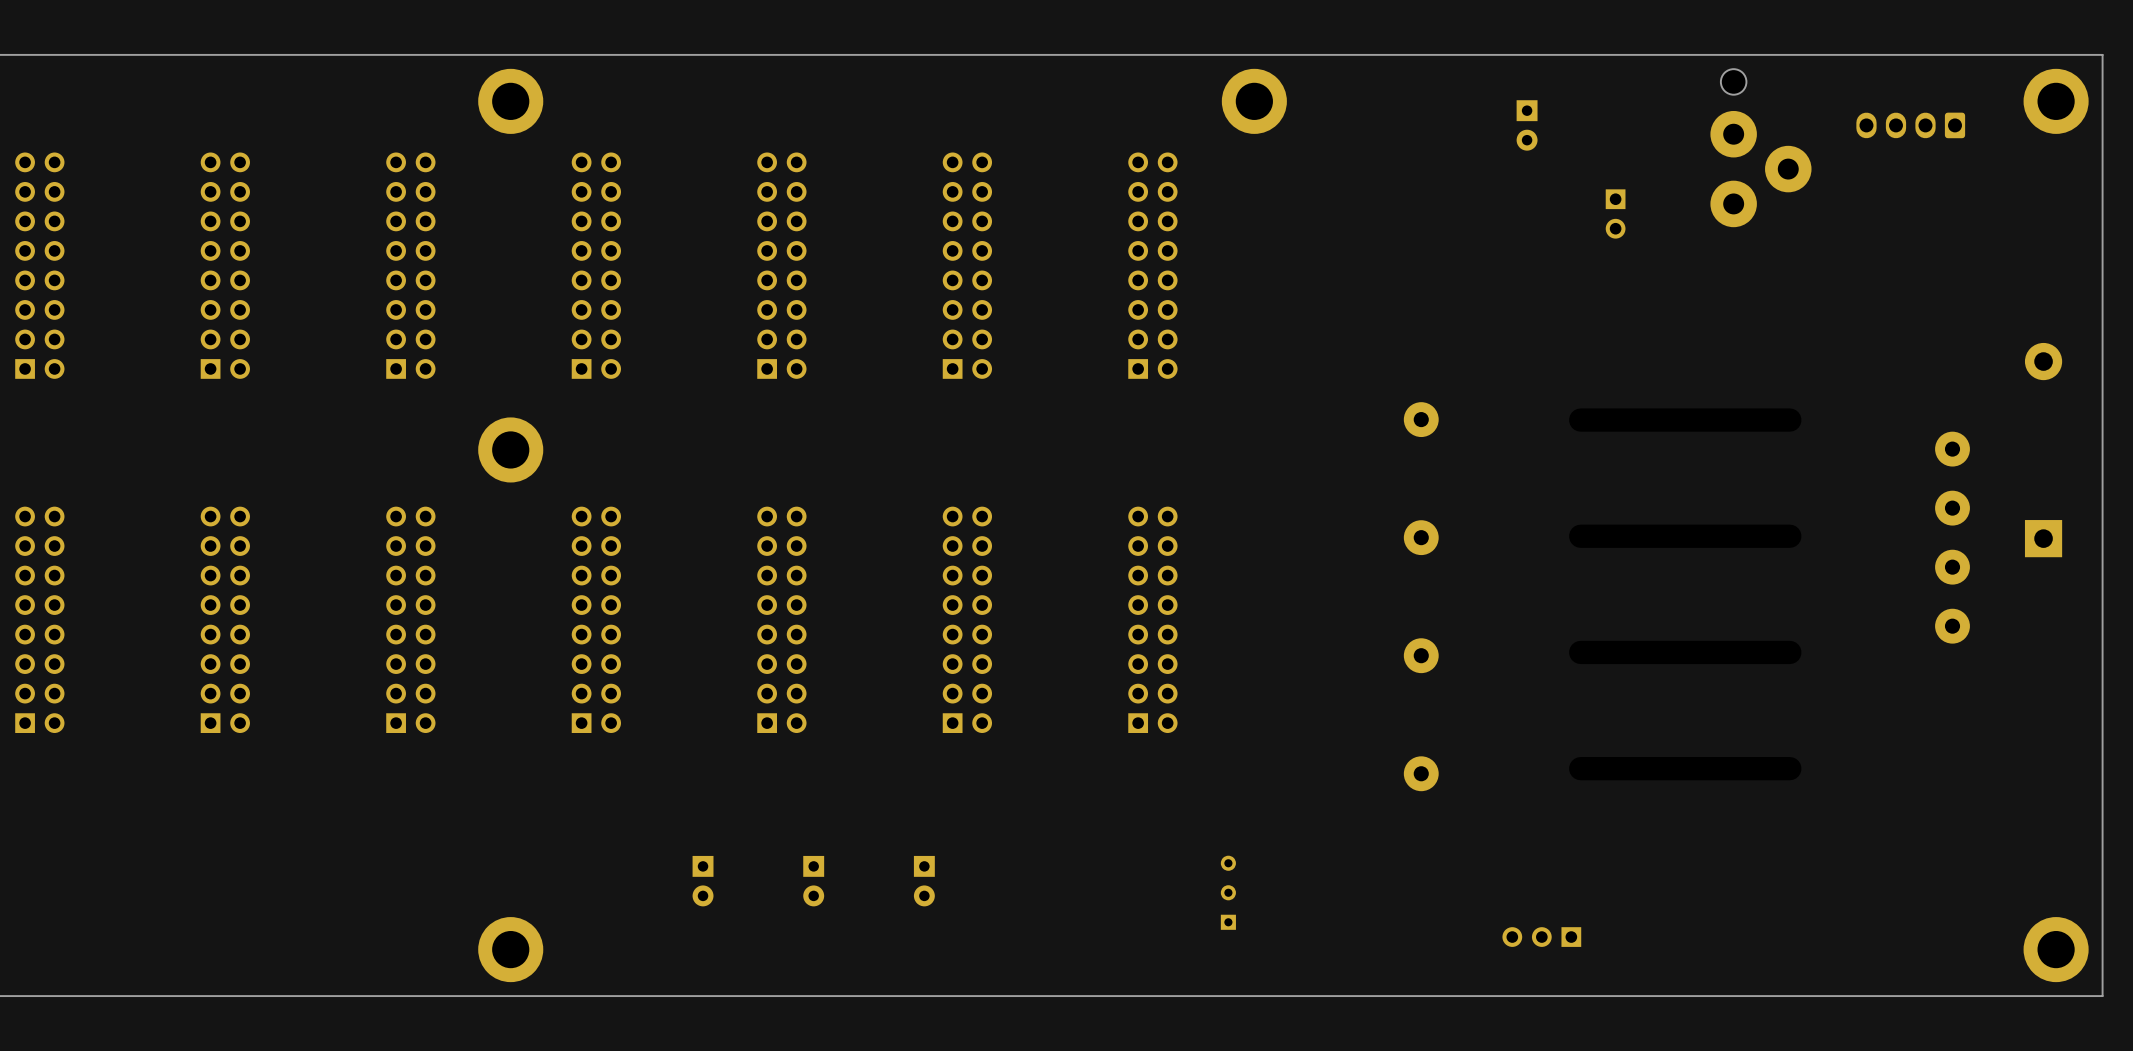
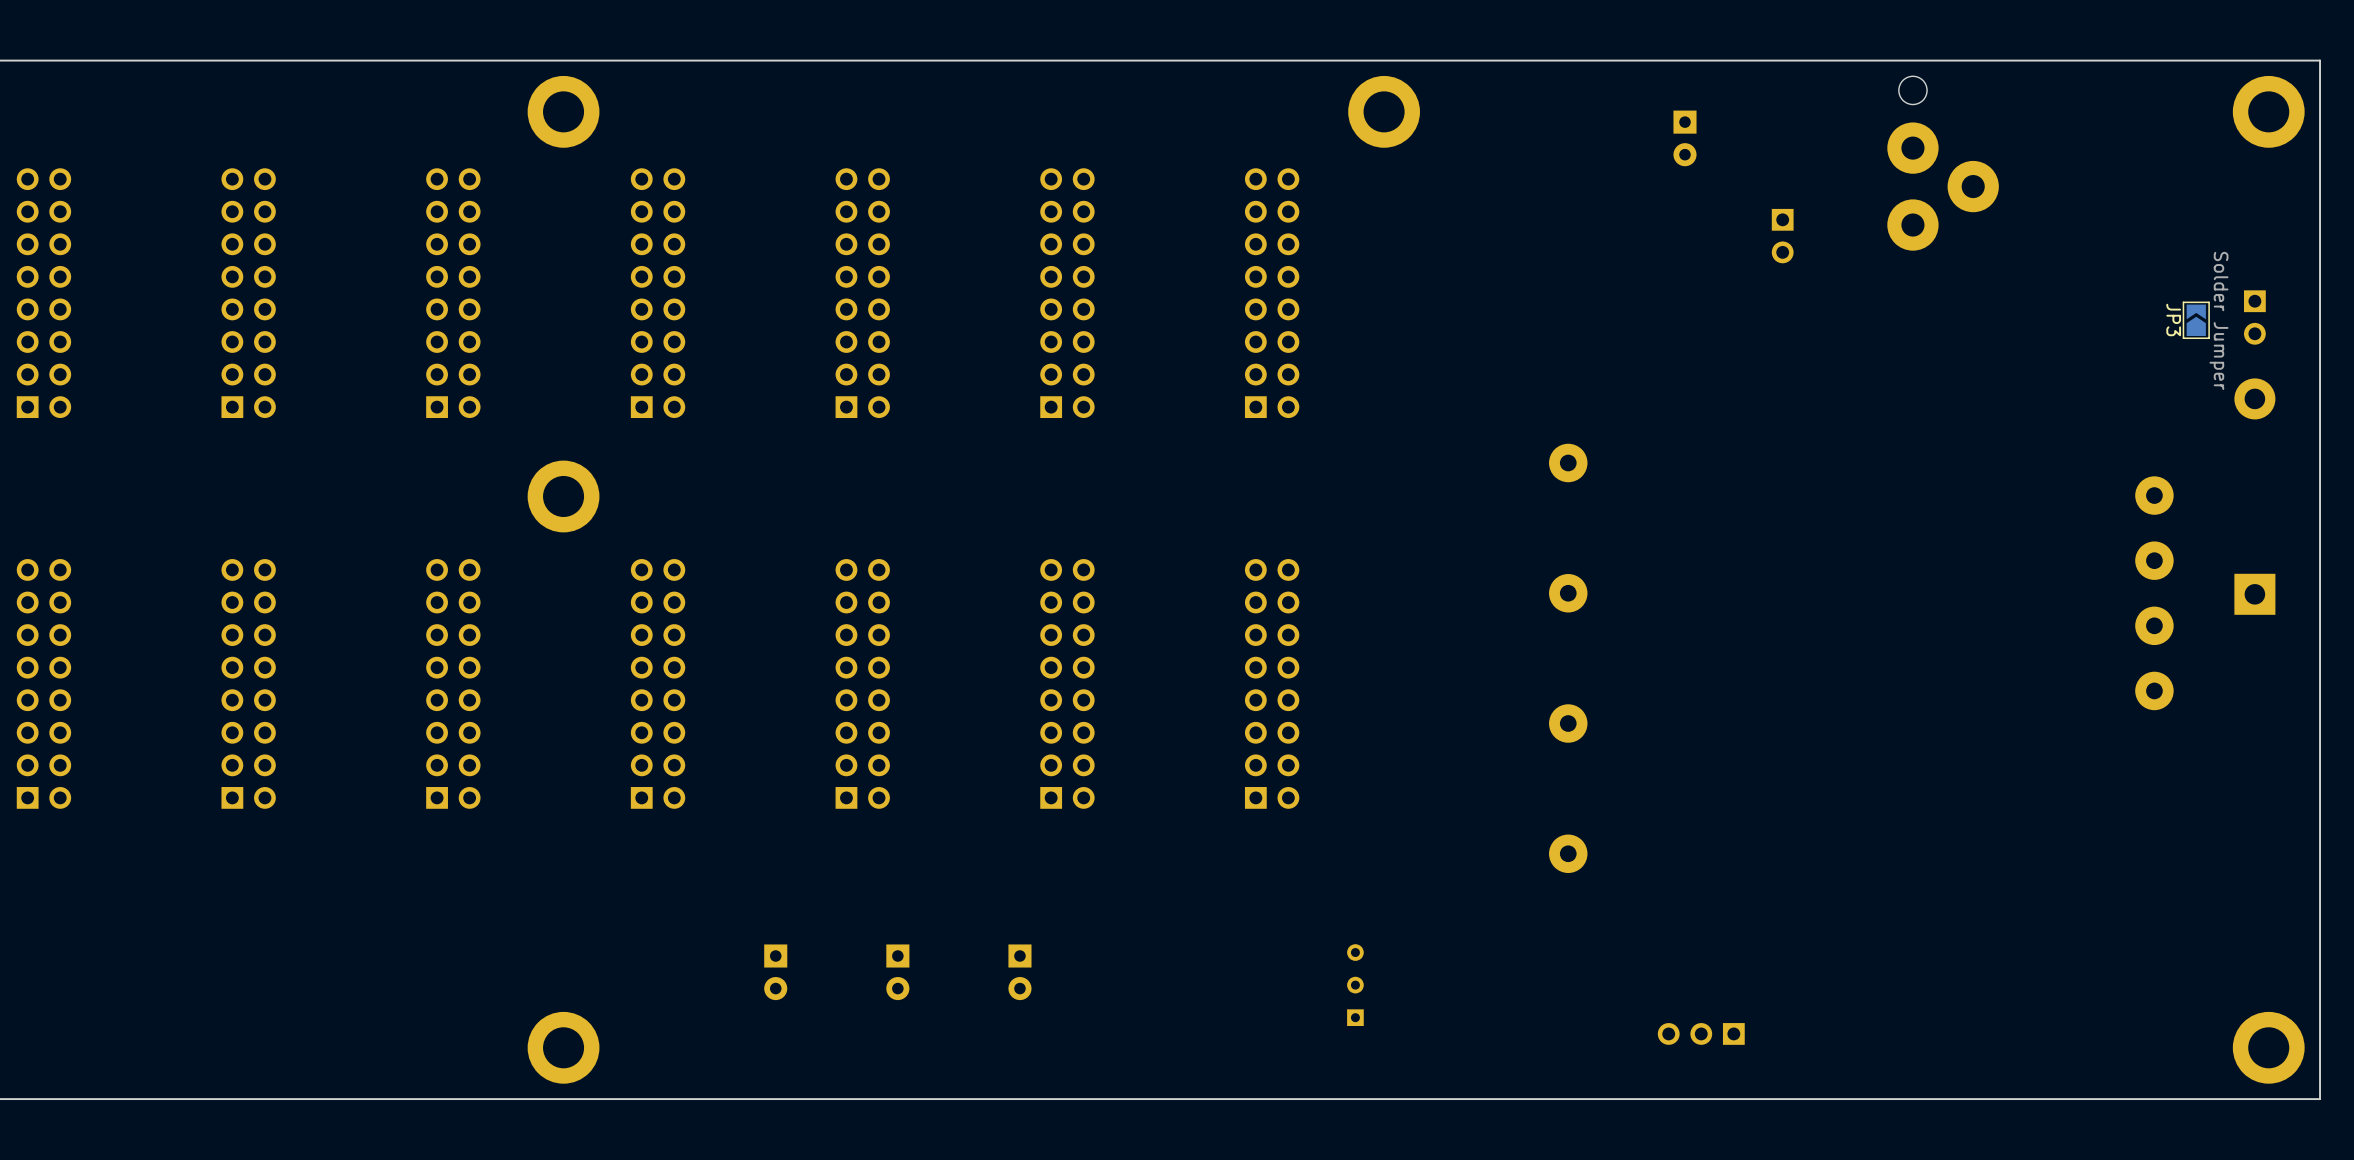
part: (1910, 125) -> none
part: none -> (2254, 317)
JP3: none -> Solder Jumper (2196, 320)

